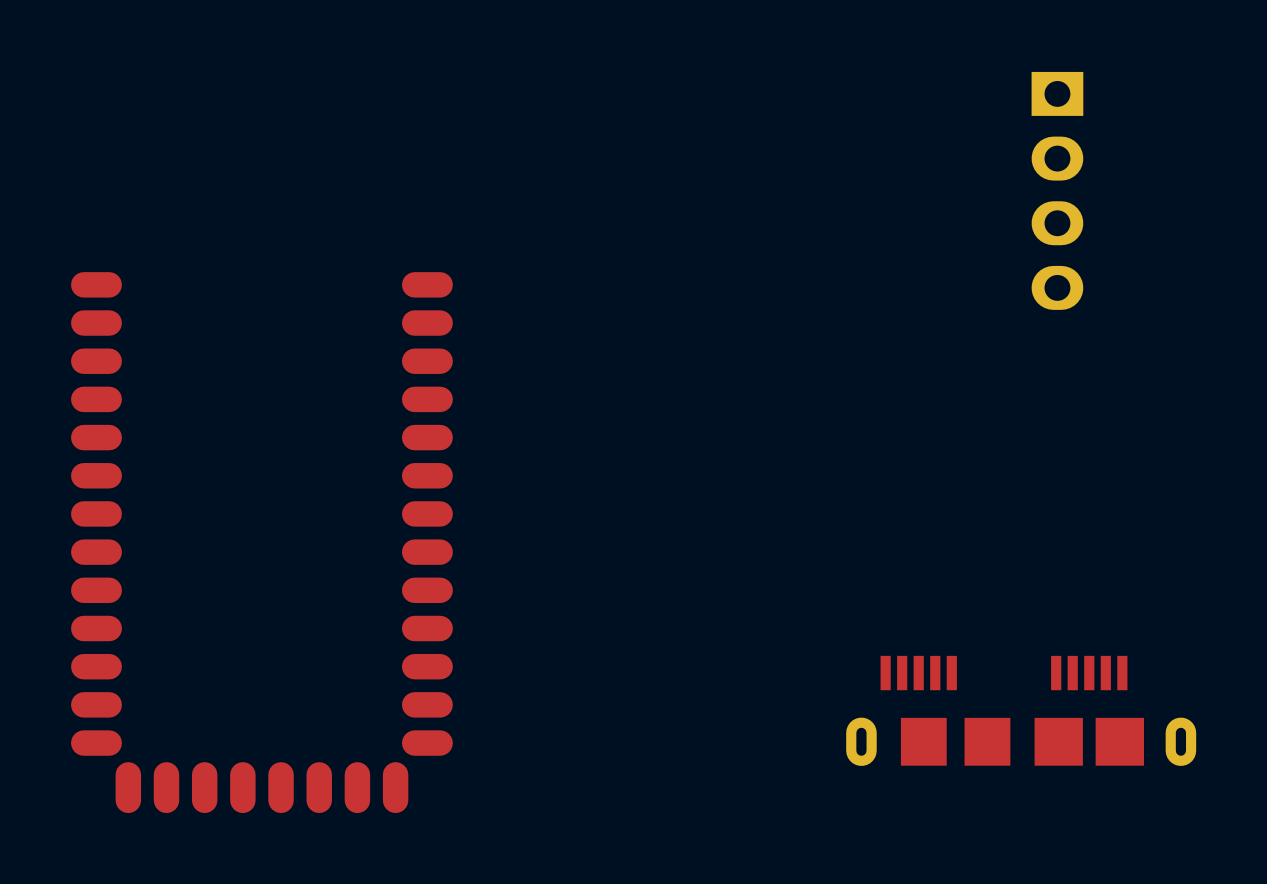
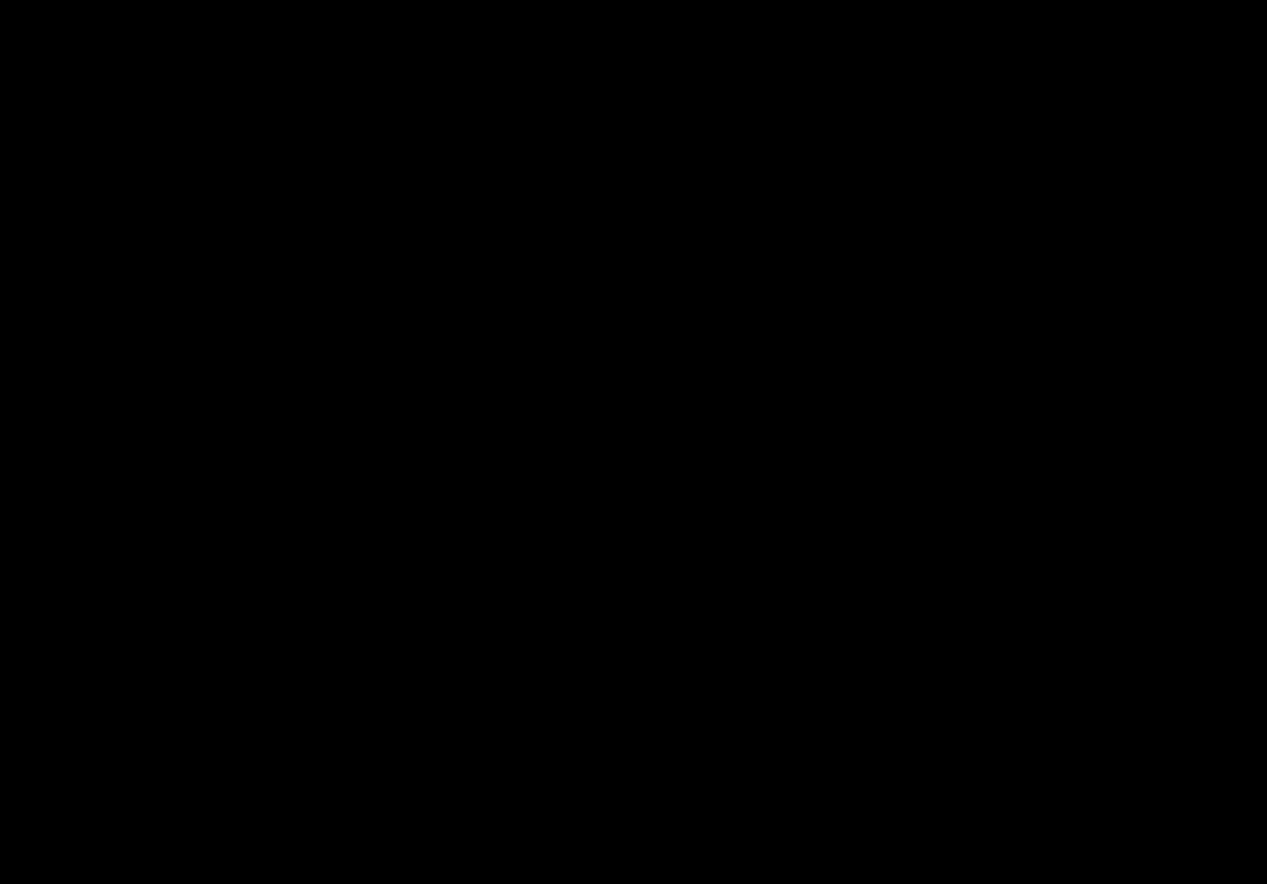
part: (1057, 190) -> none
part: (261, 542) -> none
part: (1021, 710) -> none

